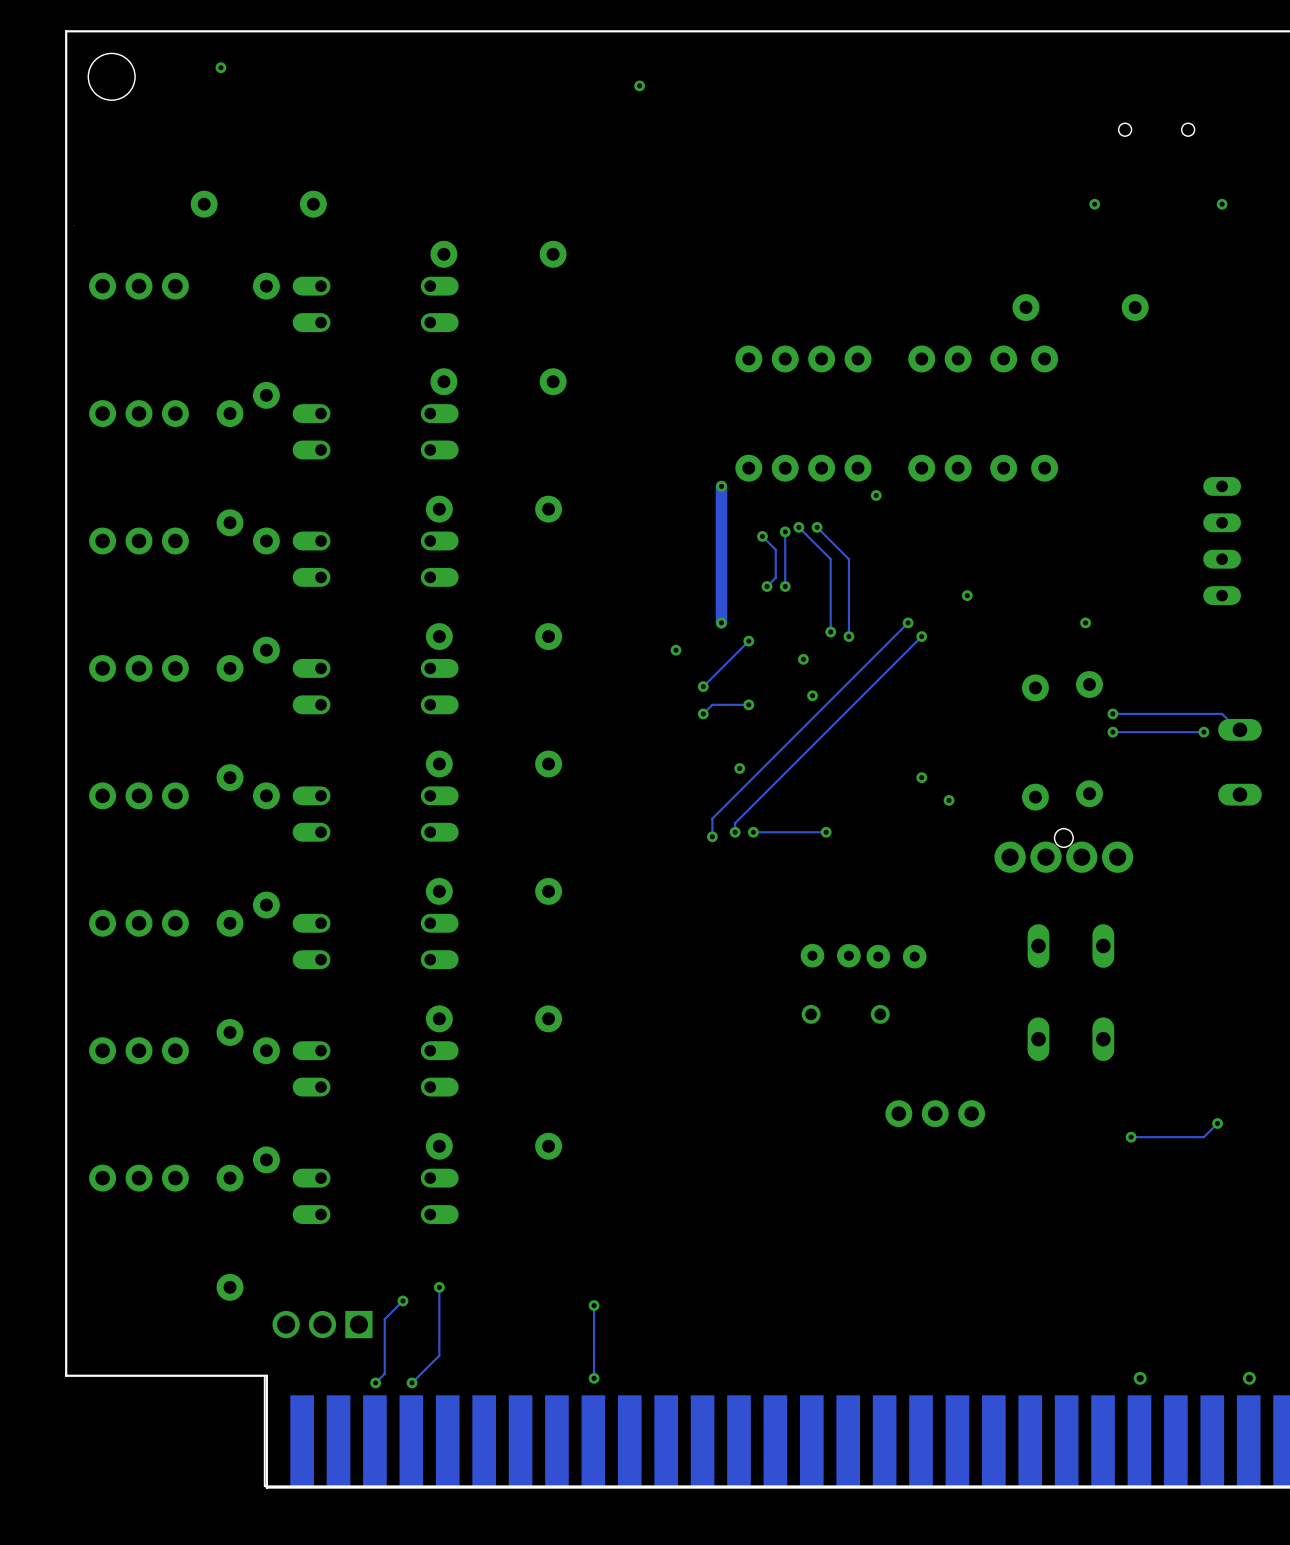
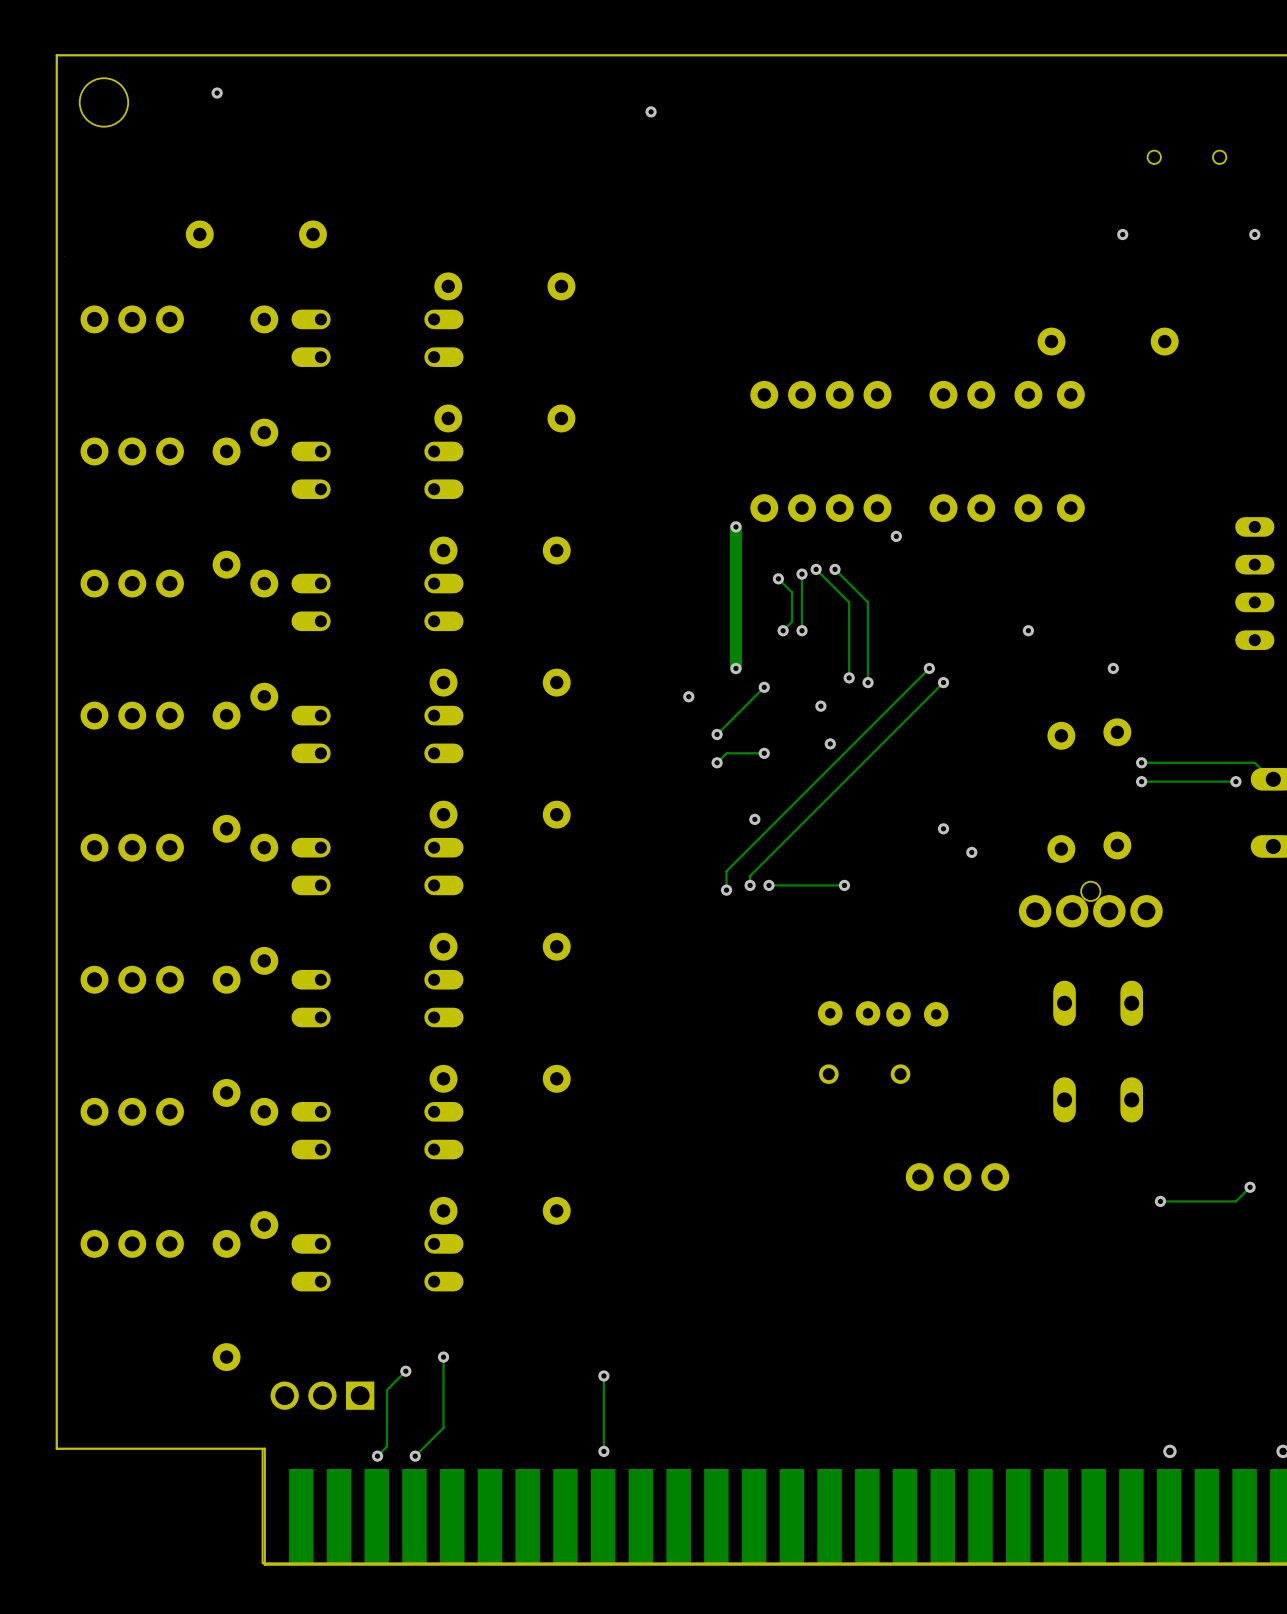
via position: (967, 595) -> (1028, 630)

